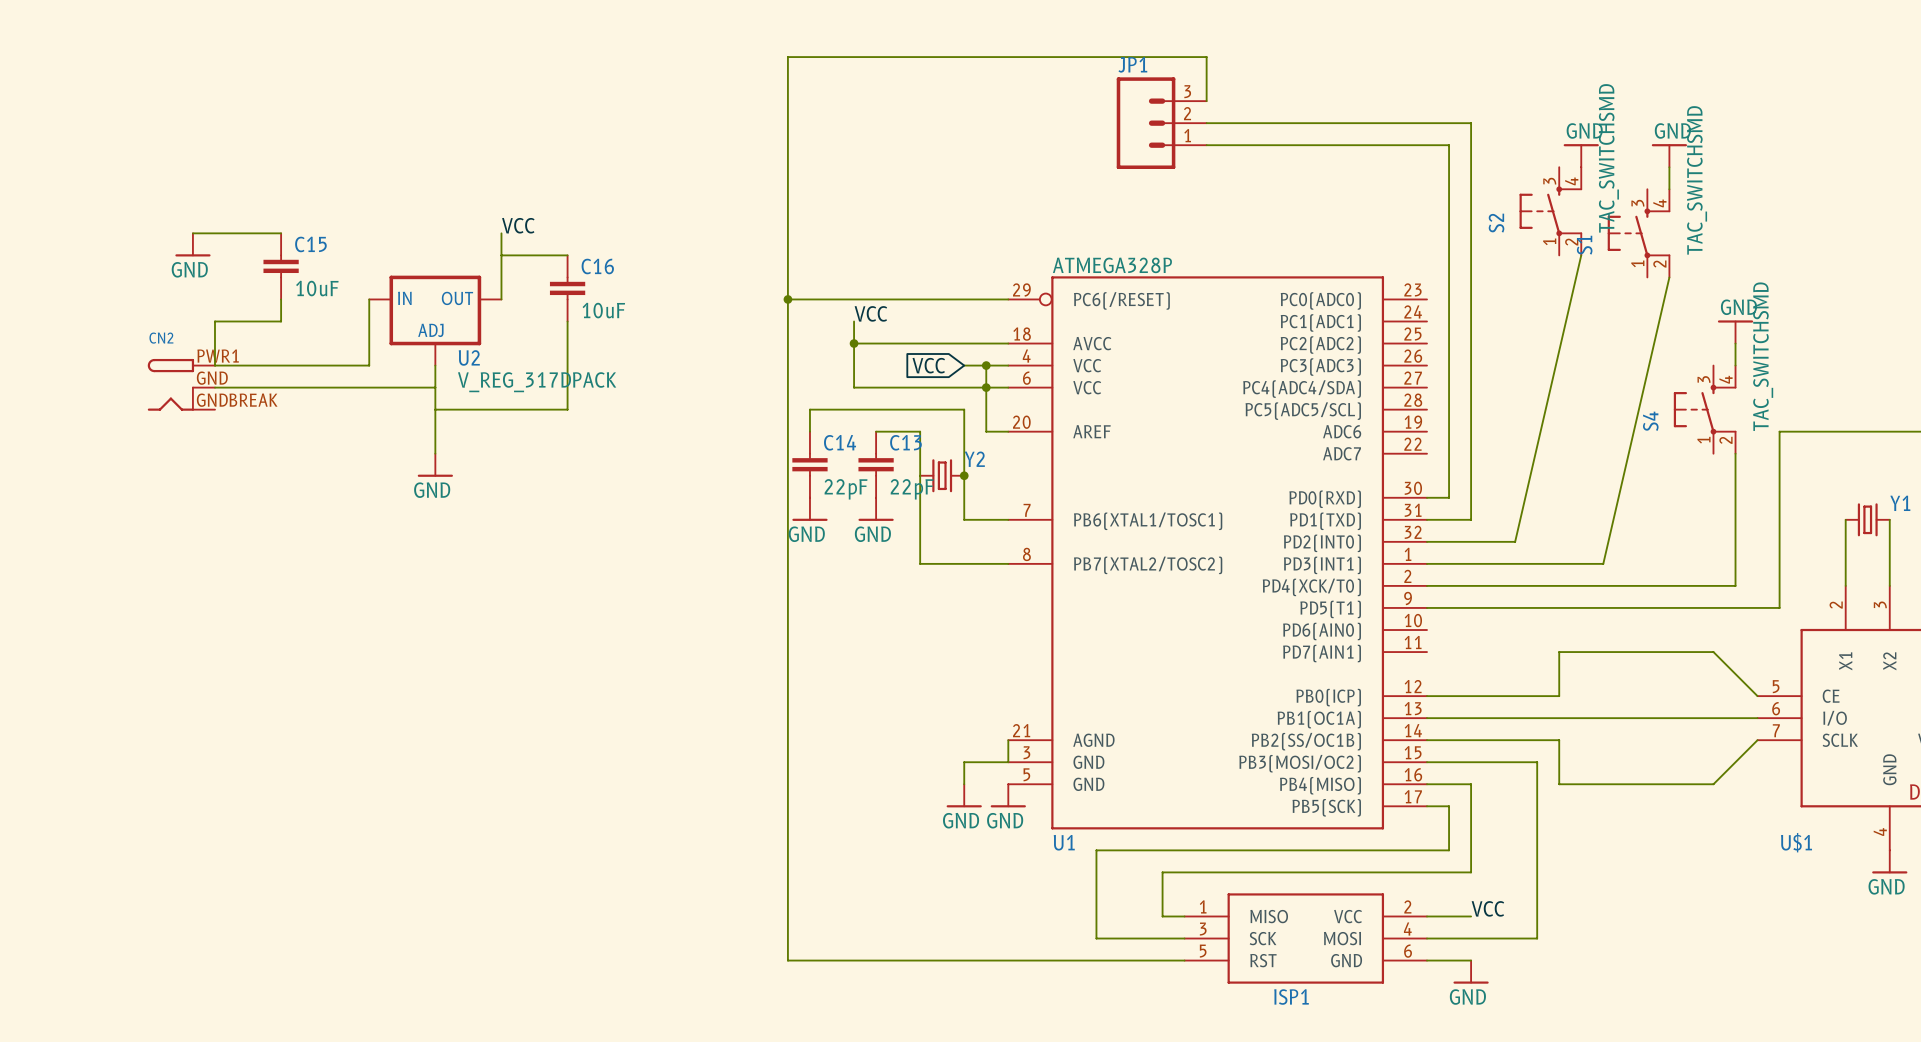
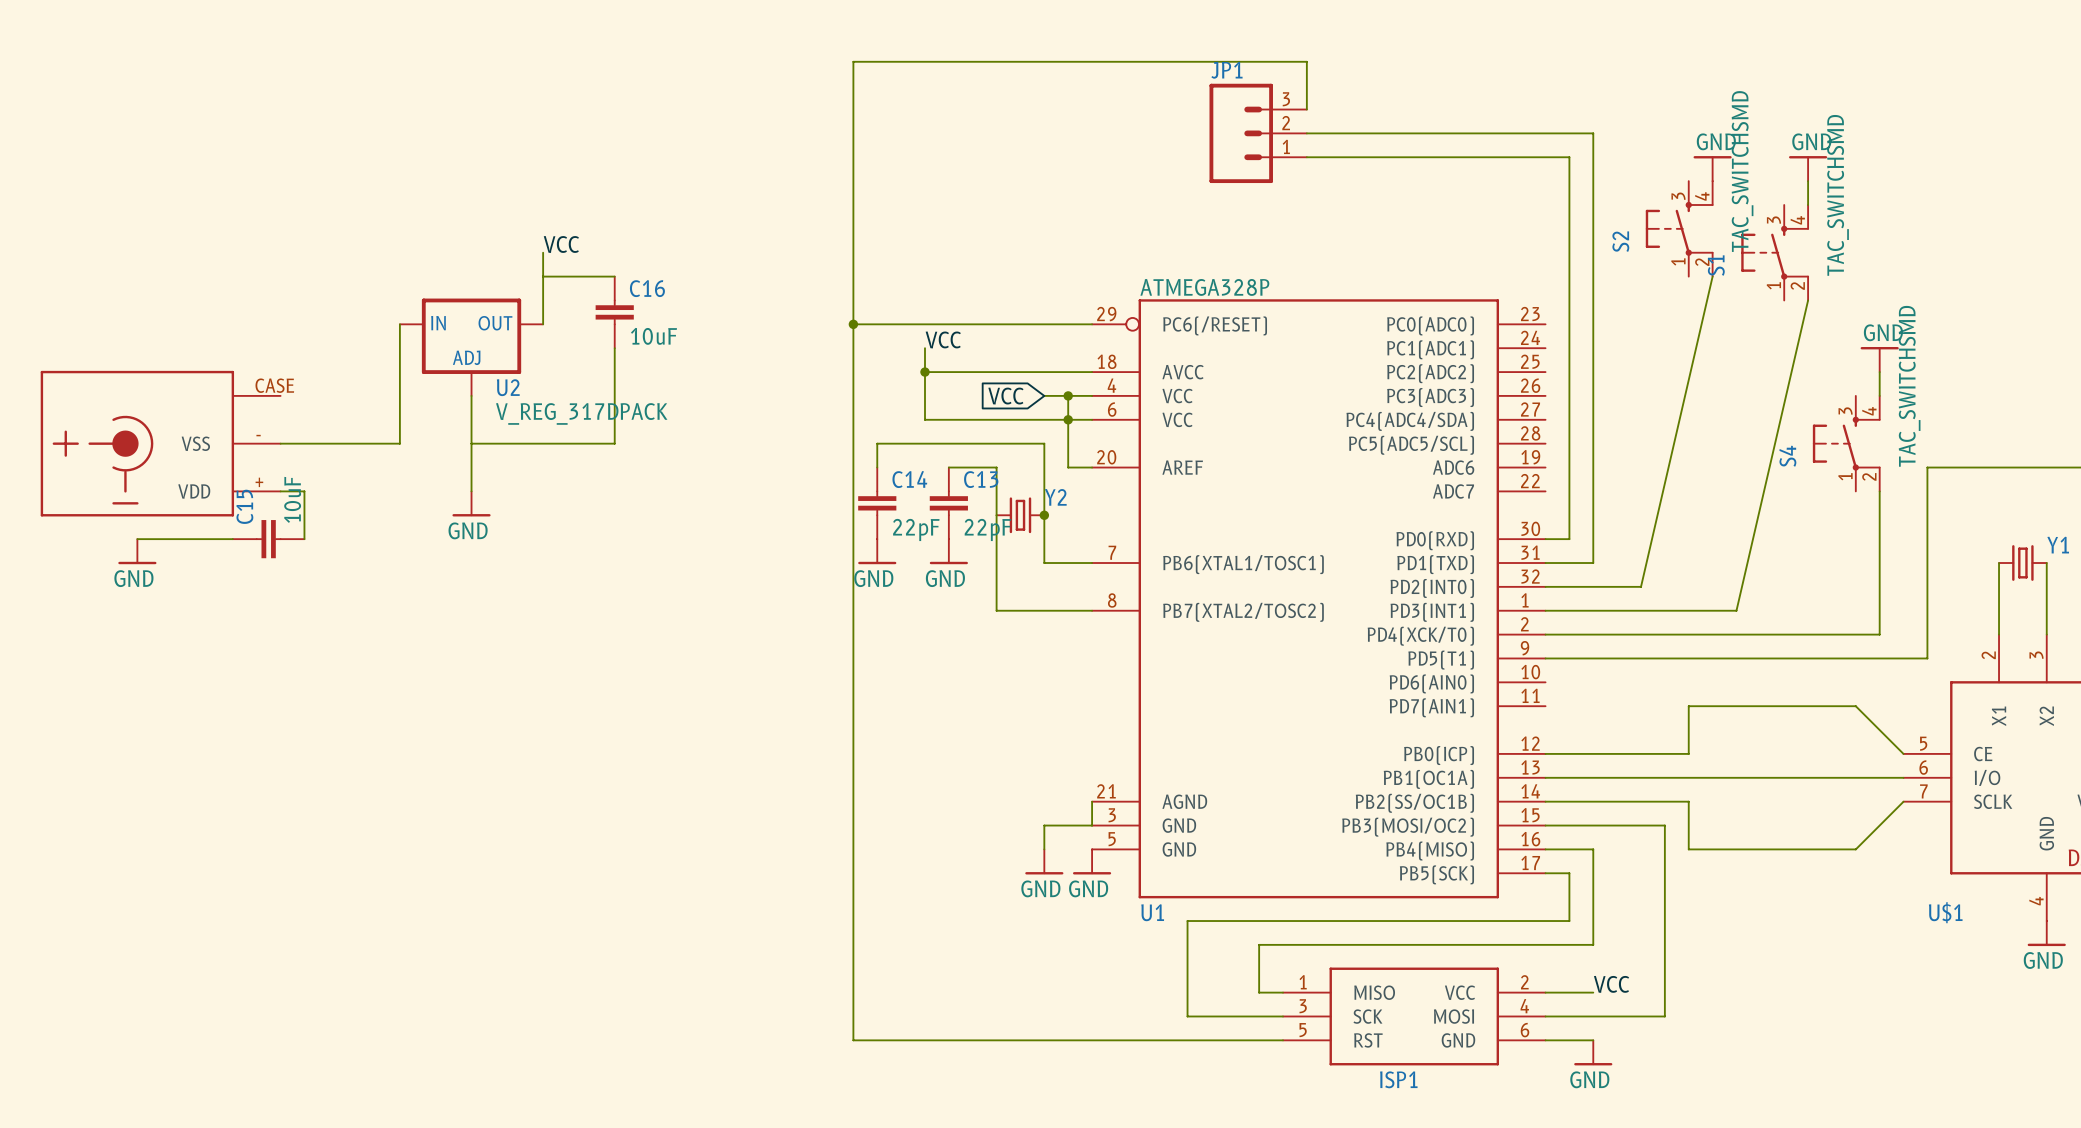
wire: (192, 233) (281, 233) -> none
power symbol: GND (192, 244) -> none
C15 name position: C15 (310, 244) -> C15 (244, 506)
C15 rotation: 0° (281, 266) -> 90° clockwise (268, 539)
C15 position: (281, 266) -> (268, 539)
C15 value position: 10uF (317, 288) -> 10uF (292, 499)
wire: (281, 299) (281, 321) (214, 321) (214, 365) (369, 365) -> (280, 443) (399, 443) (399, 395)
CN2: (181, 384) -> none
wire: (214, 387) (435, 387) -> none
part: none -> (160, 443)
wire: none -> (280, 491) (304, 491) (304, 539)
wire: none -> (137, 539) (232, 539)
power symbol: none -> GND (137, 551)

